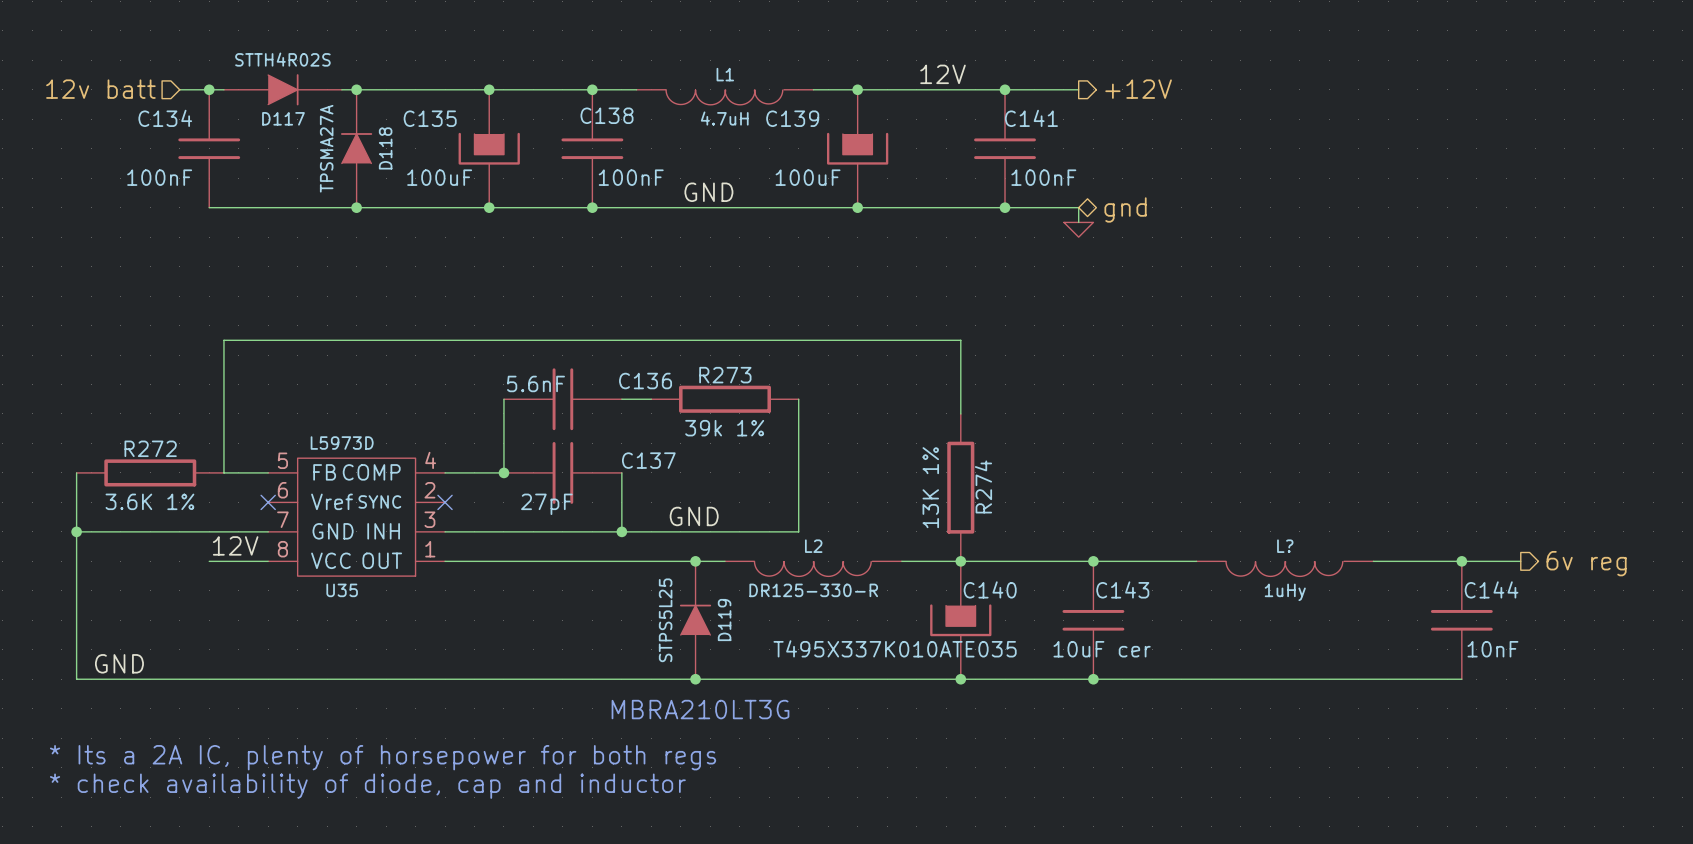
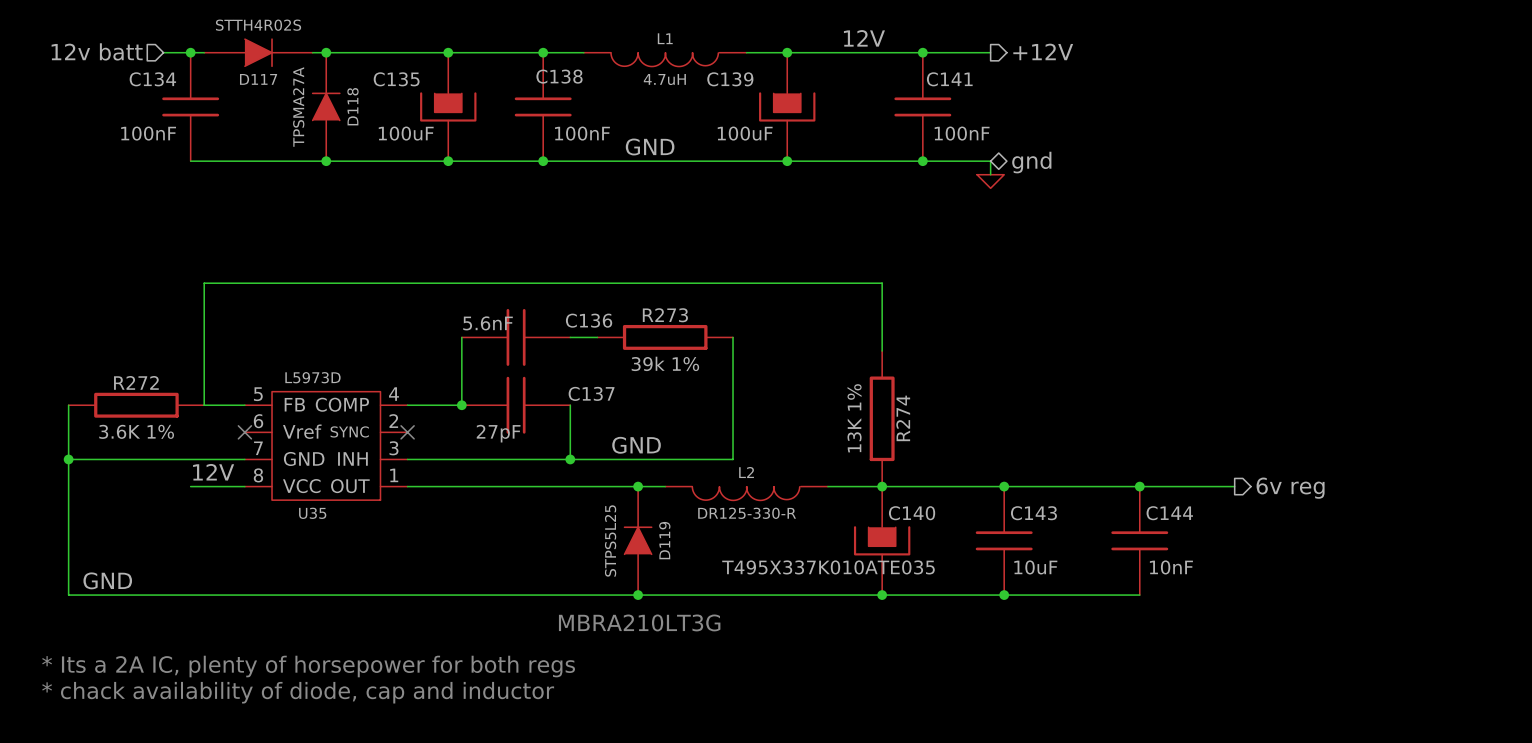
junction: none -> (1139, 486)
wire: (1373, 561) (1520, 561) -> (1099, 486) (1234, 486)
junction: (1461, 561) -> none
hierarchical label position: 6v reg (1586, 563) -> 6v reg (1290, 488)
L?: 1uHy (1285, 568) -> none
C144 position: (1461, 620) -> (1139, 540)
C143 value: 10uF cer (1102, 649) -> 10uF (1035, 567)
wire: (1240, 679) (1461, 679) -> none
text: * check availability of diode, cap and inductor (367, 786) -> * chack availability of diode, cap and inductor (298, 692)

